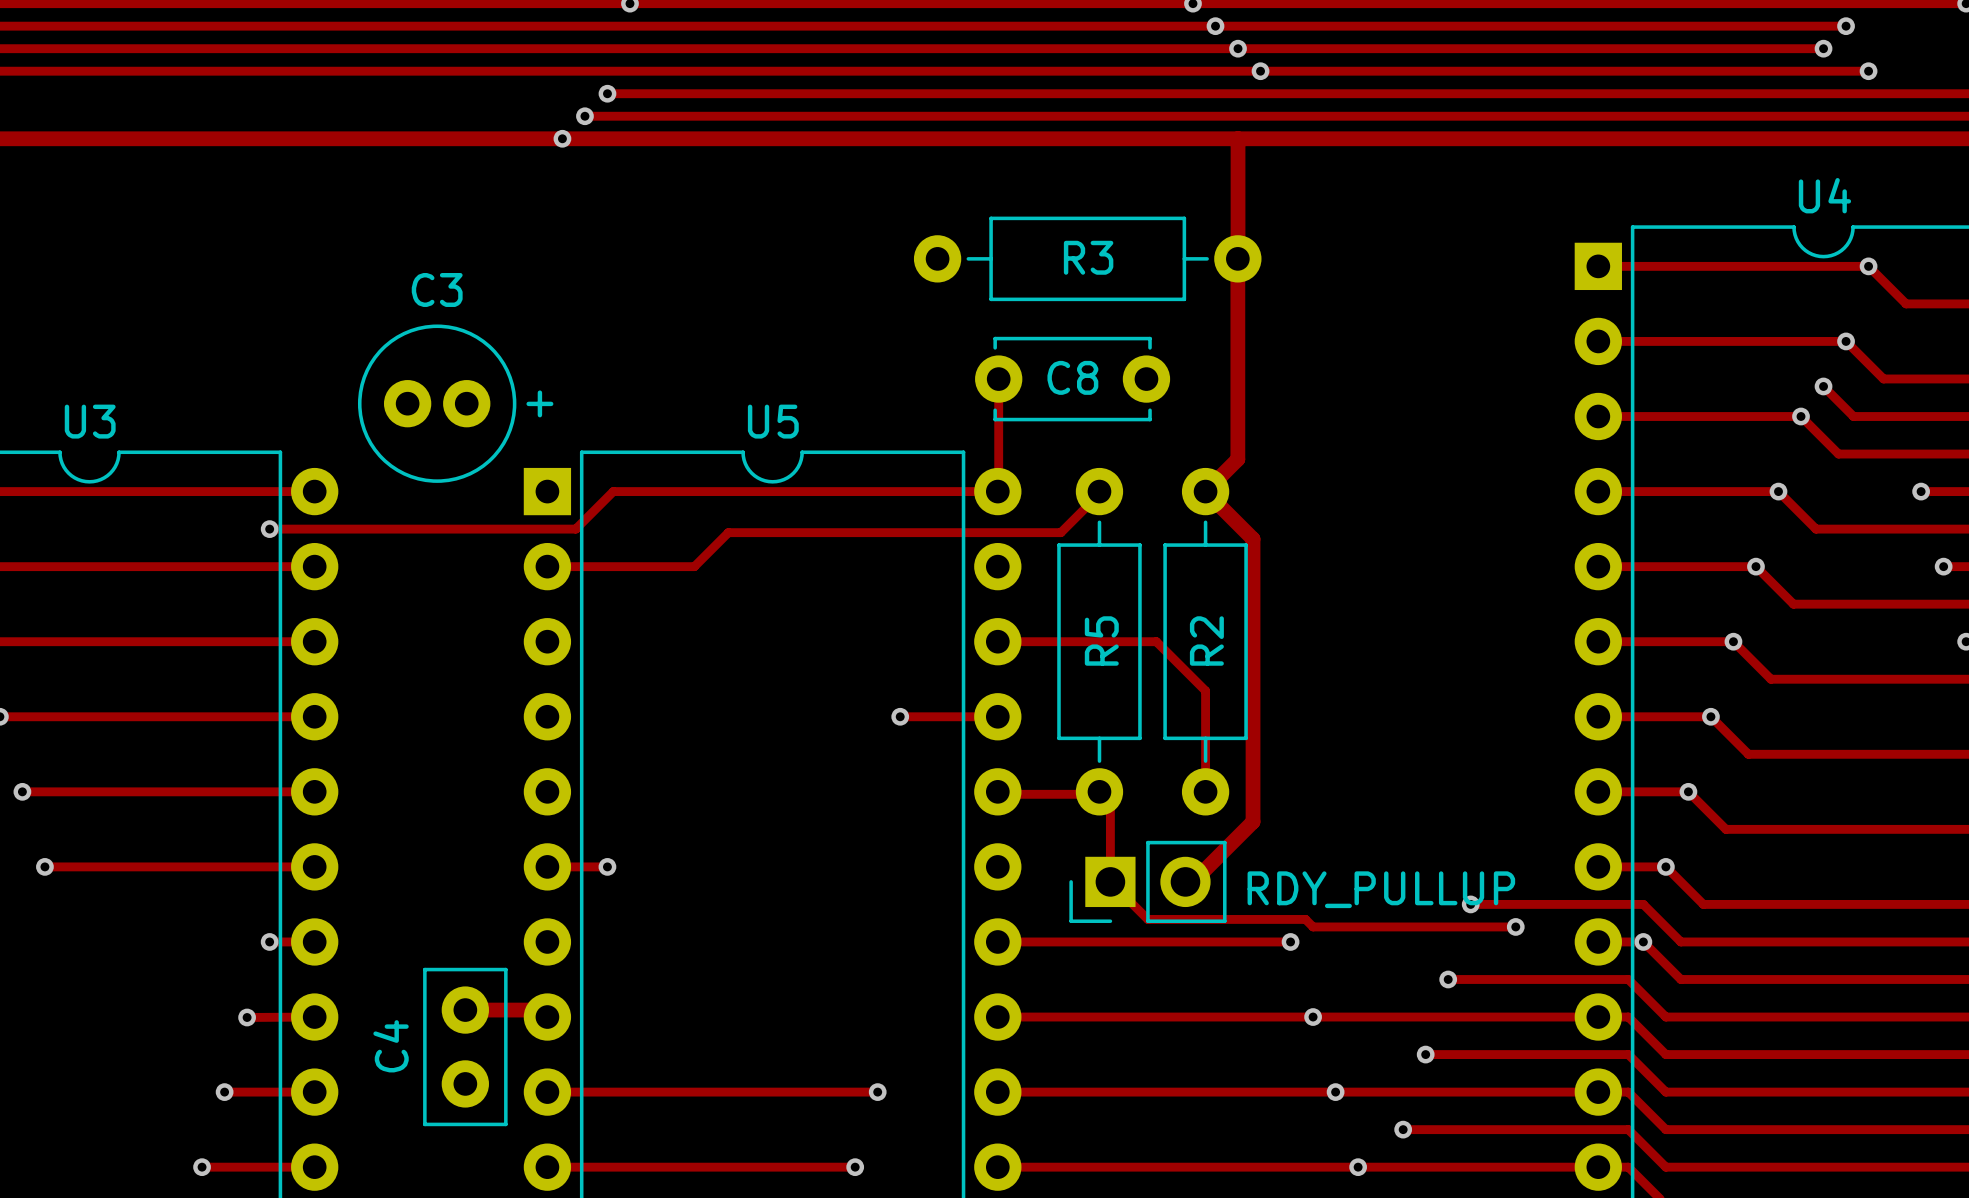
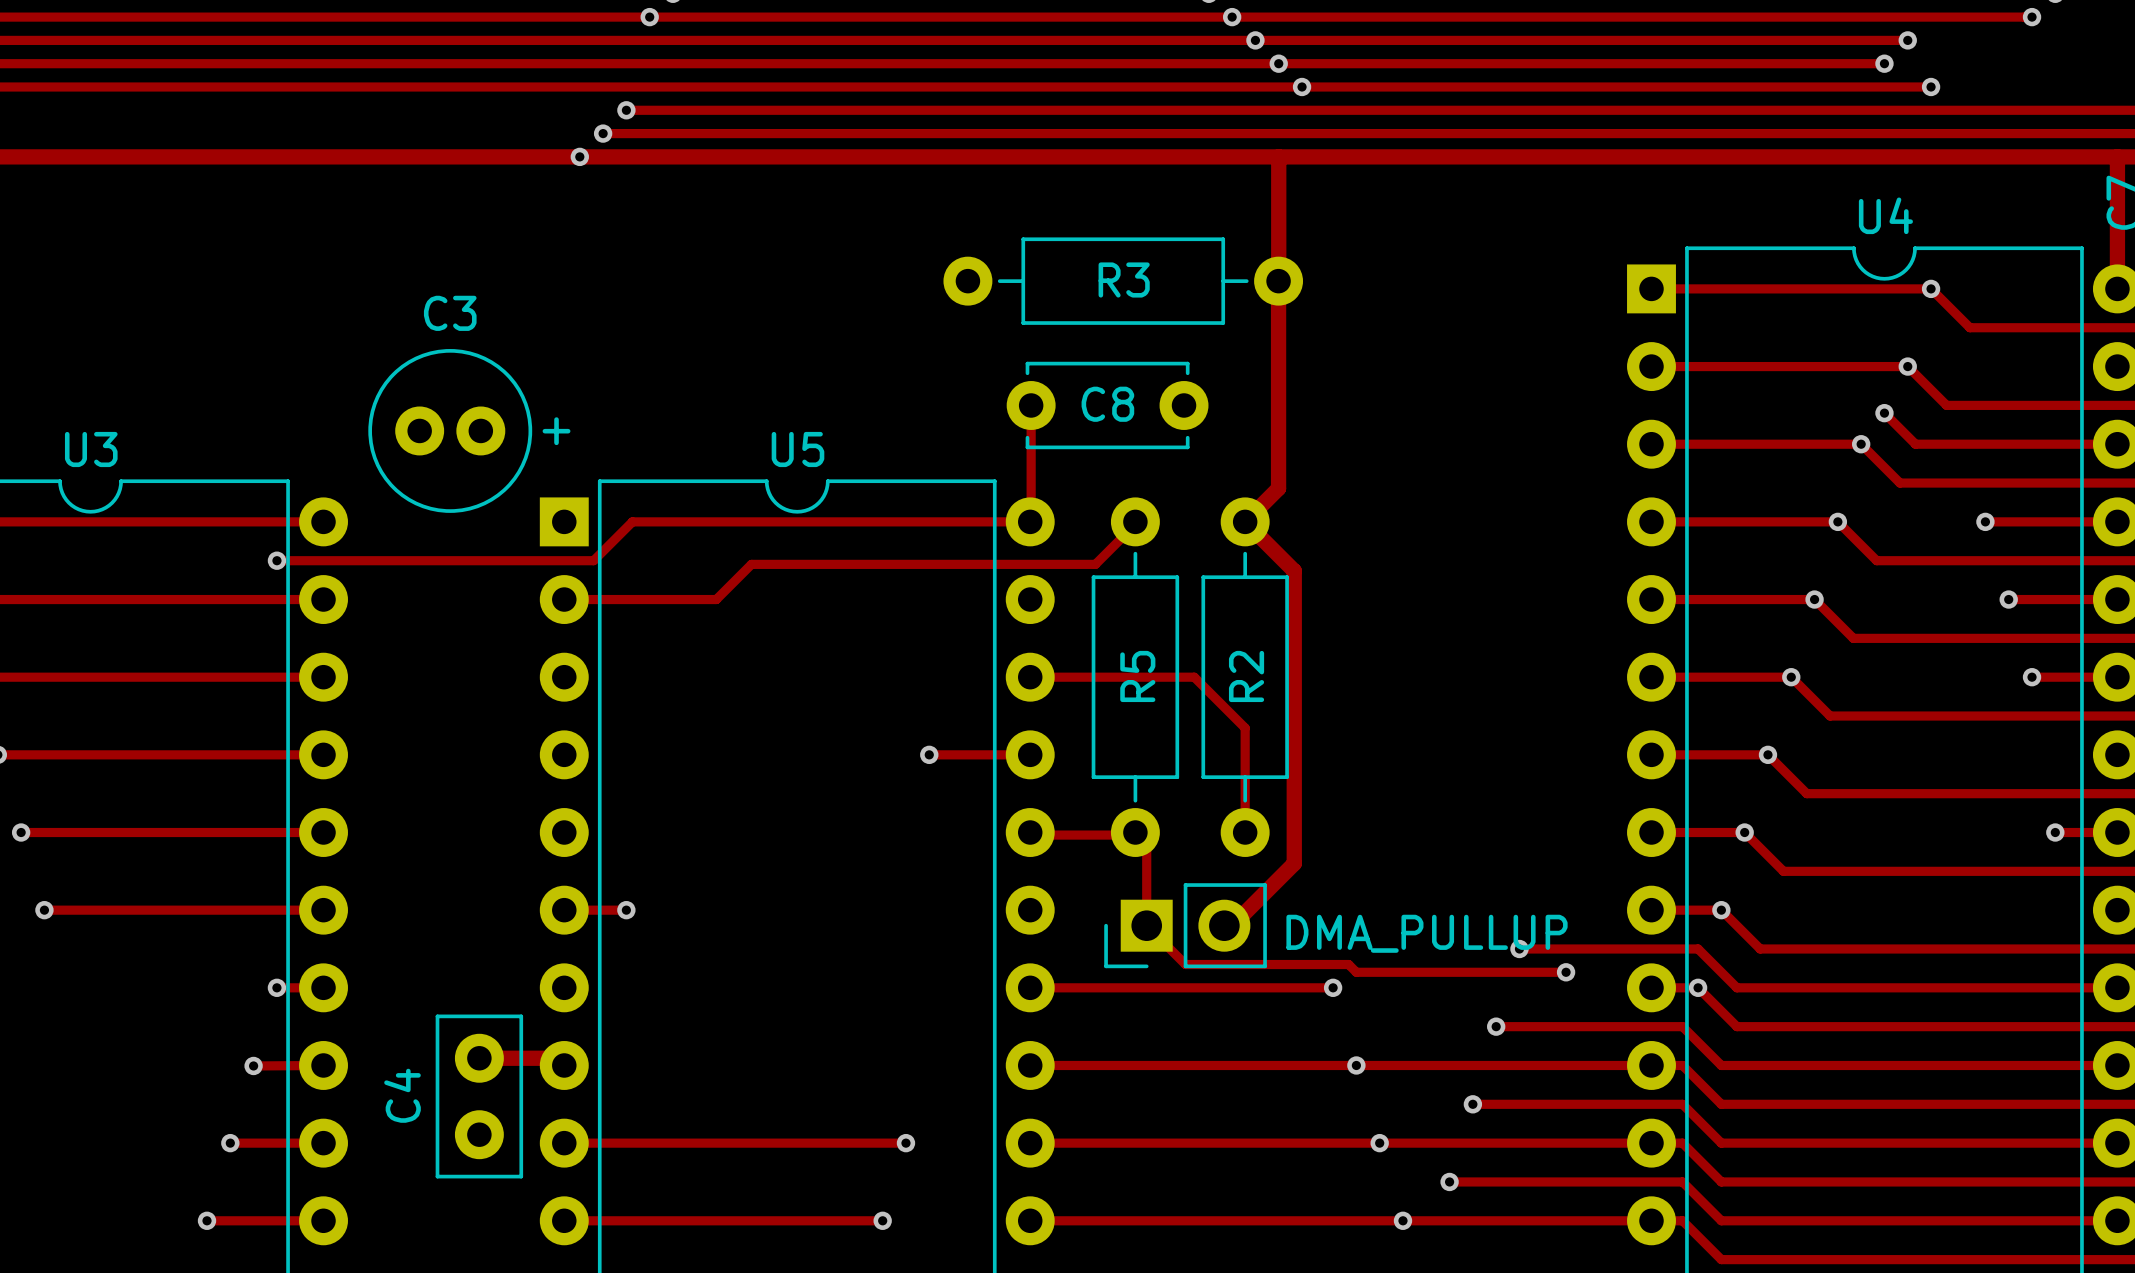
part value: RDY_PULLUP (1381, 889) -> DMA_PULLUP (1427, 933)

